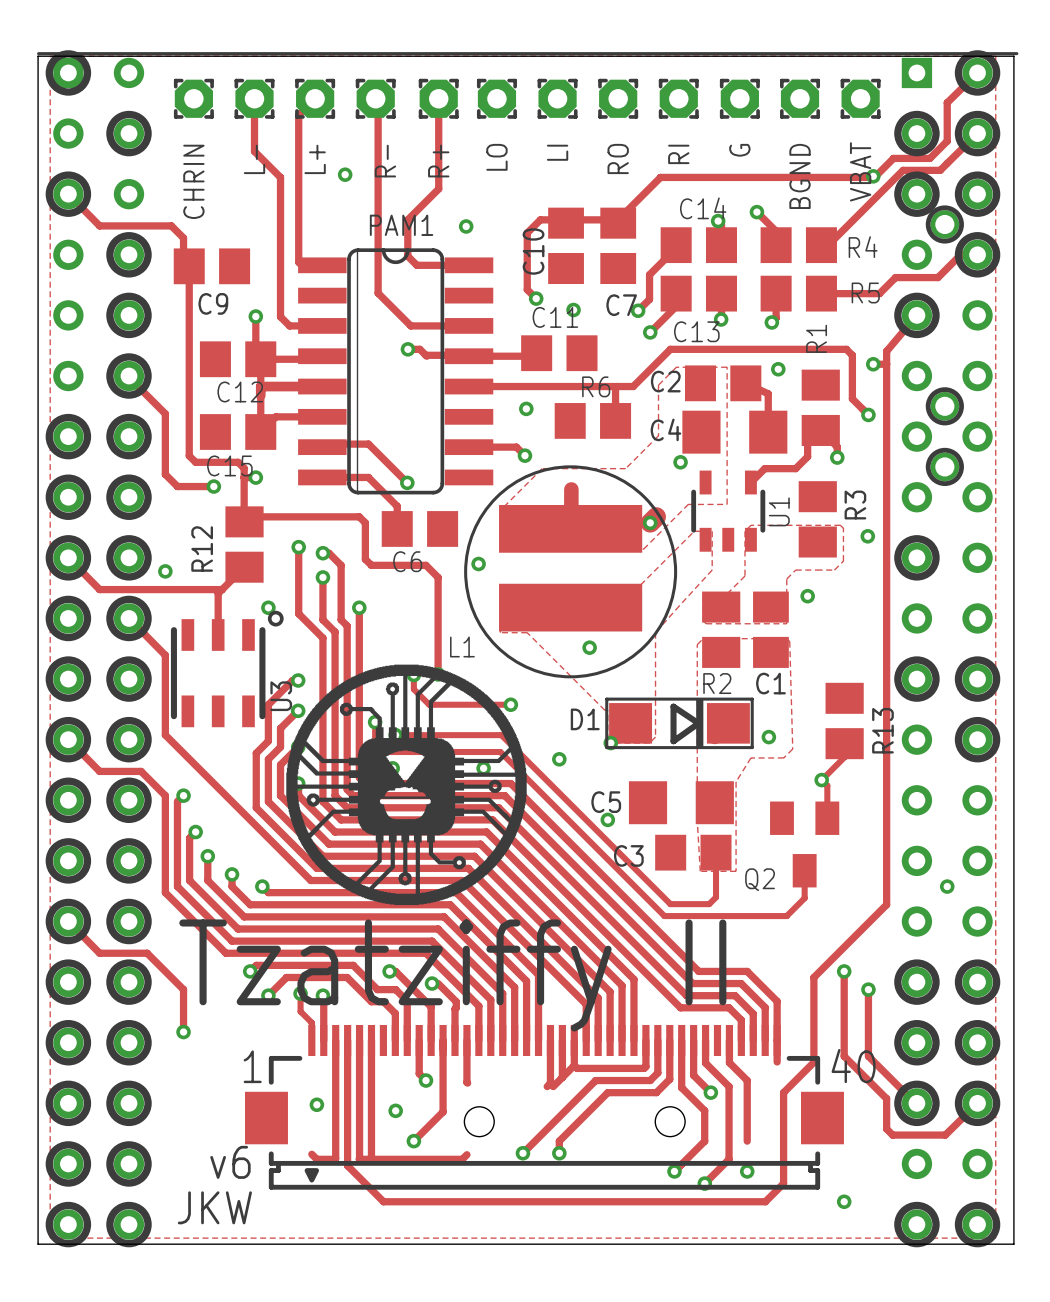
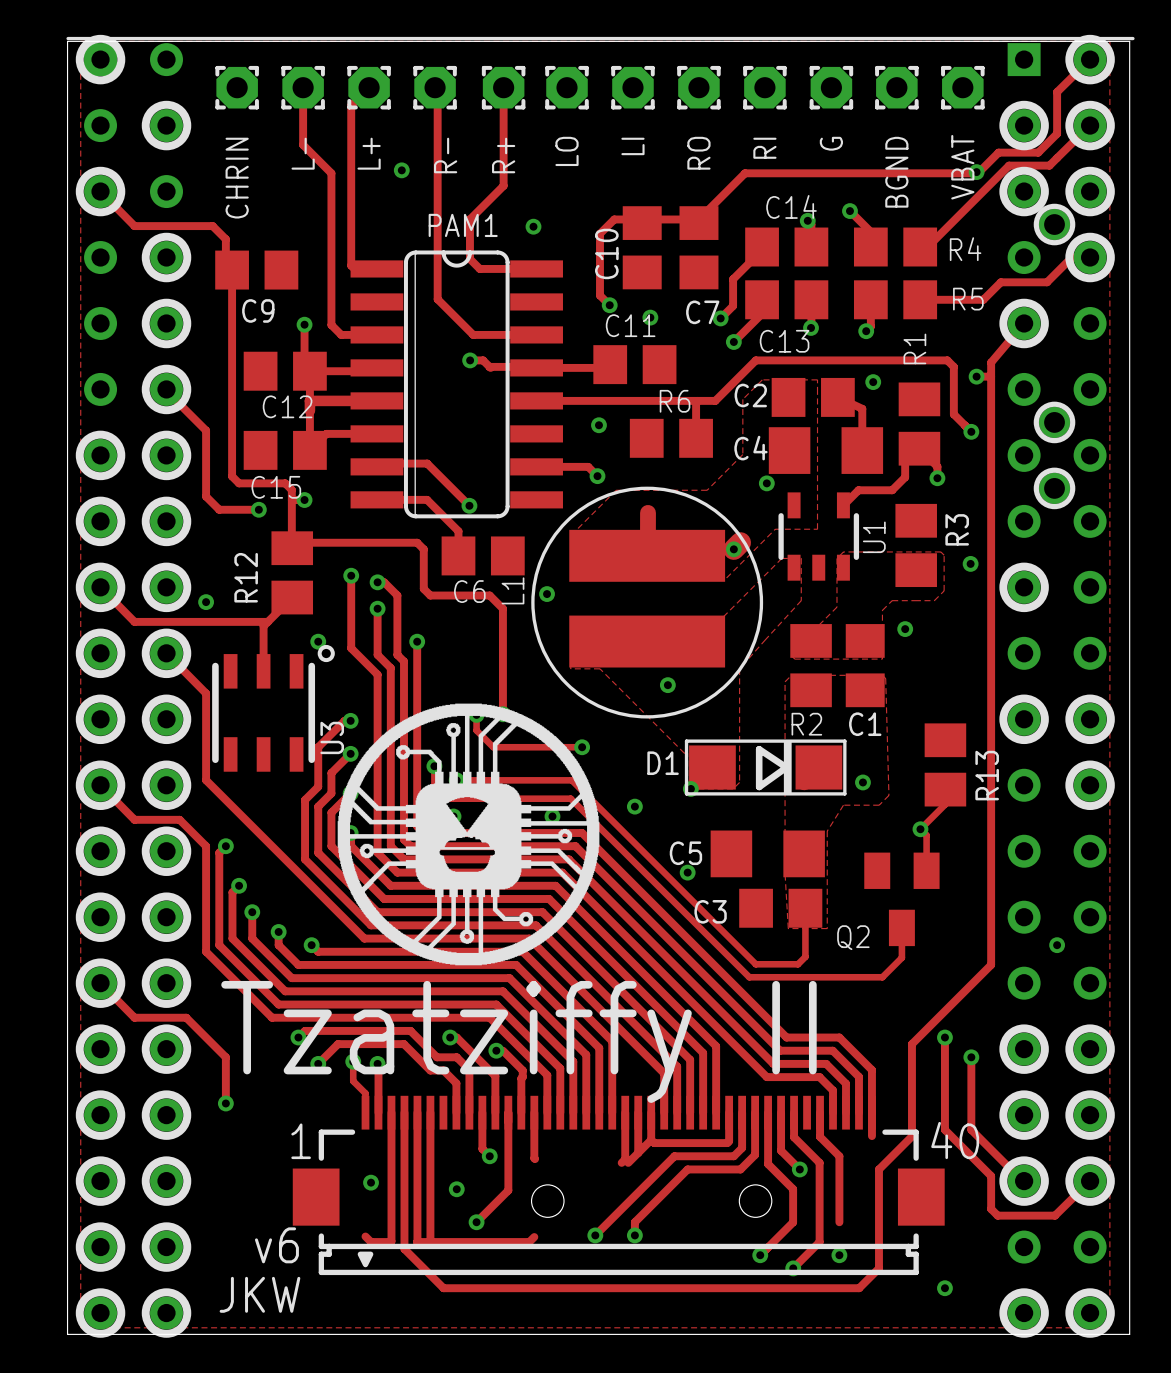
L1 name rotation: 0° (462, 647) -> 90° counterclockwise (512, 590)
L1 name position: L1 (462, 647) -> L1 (512, 590)

